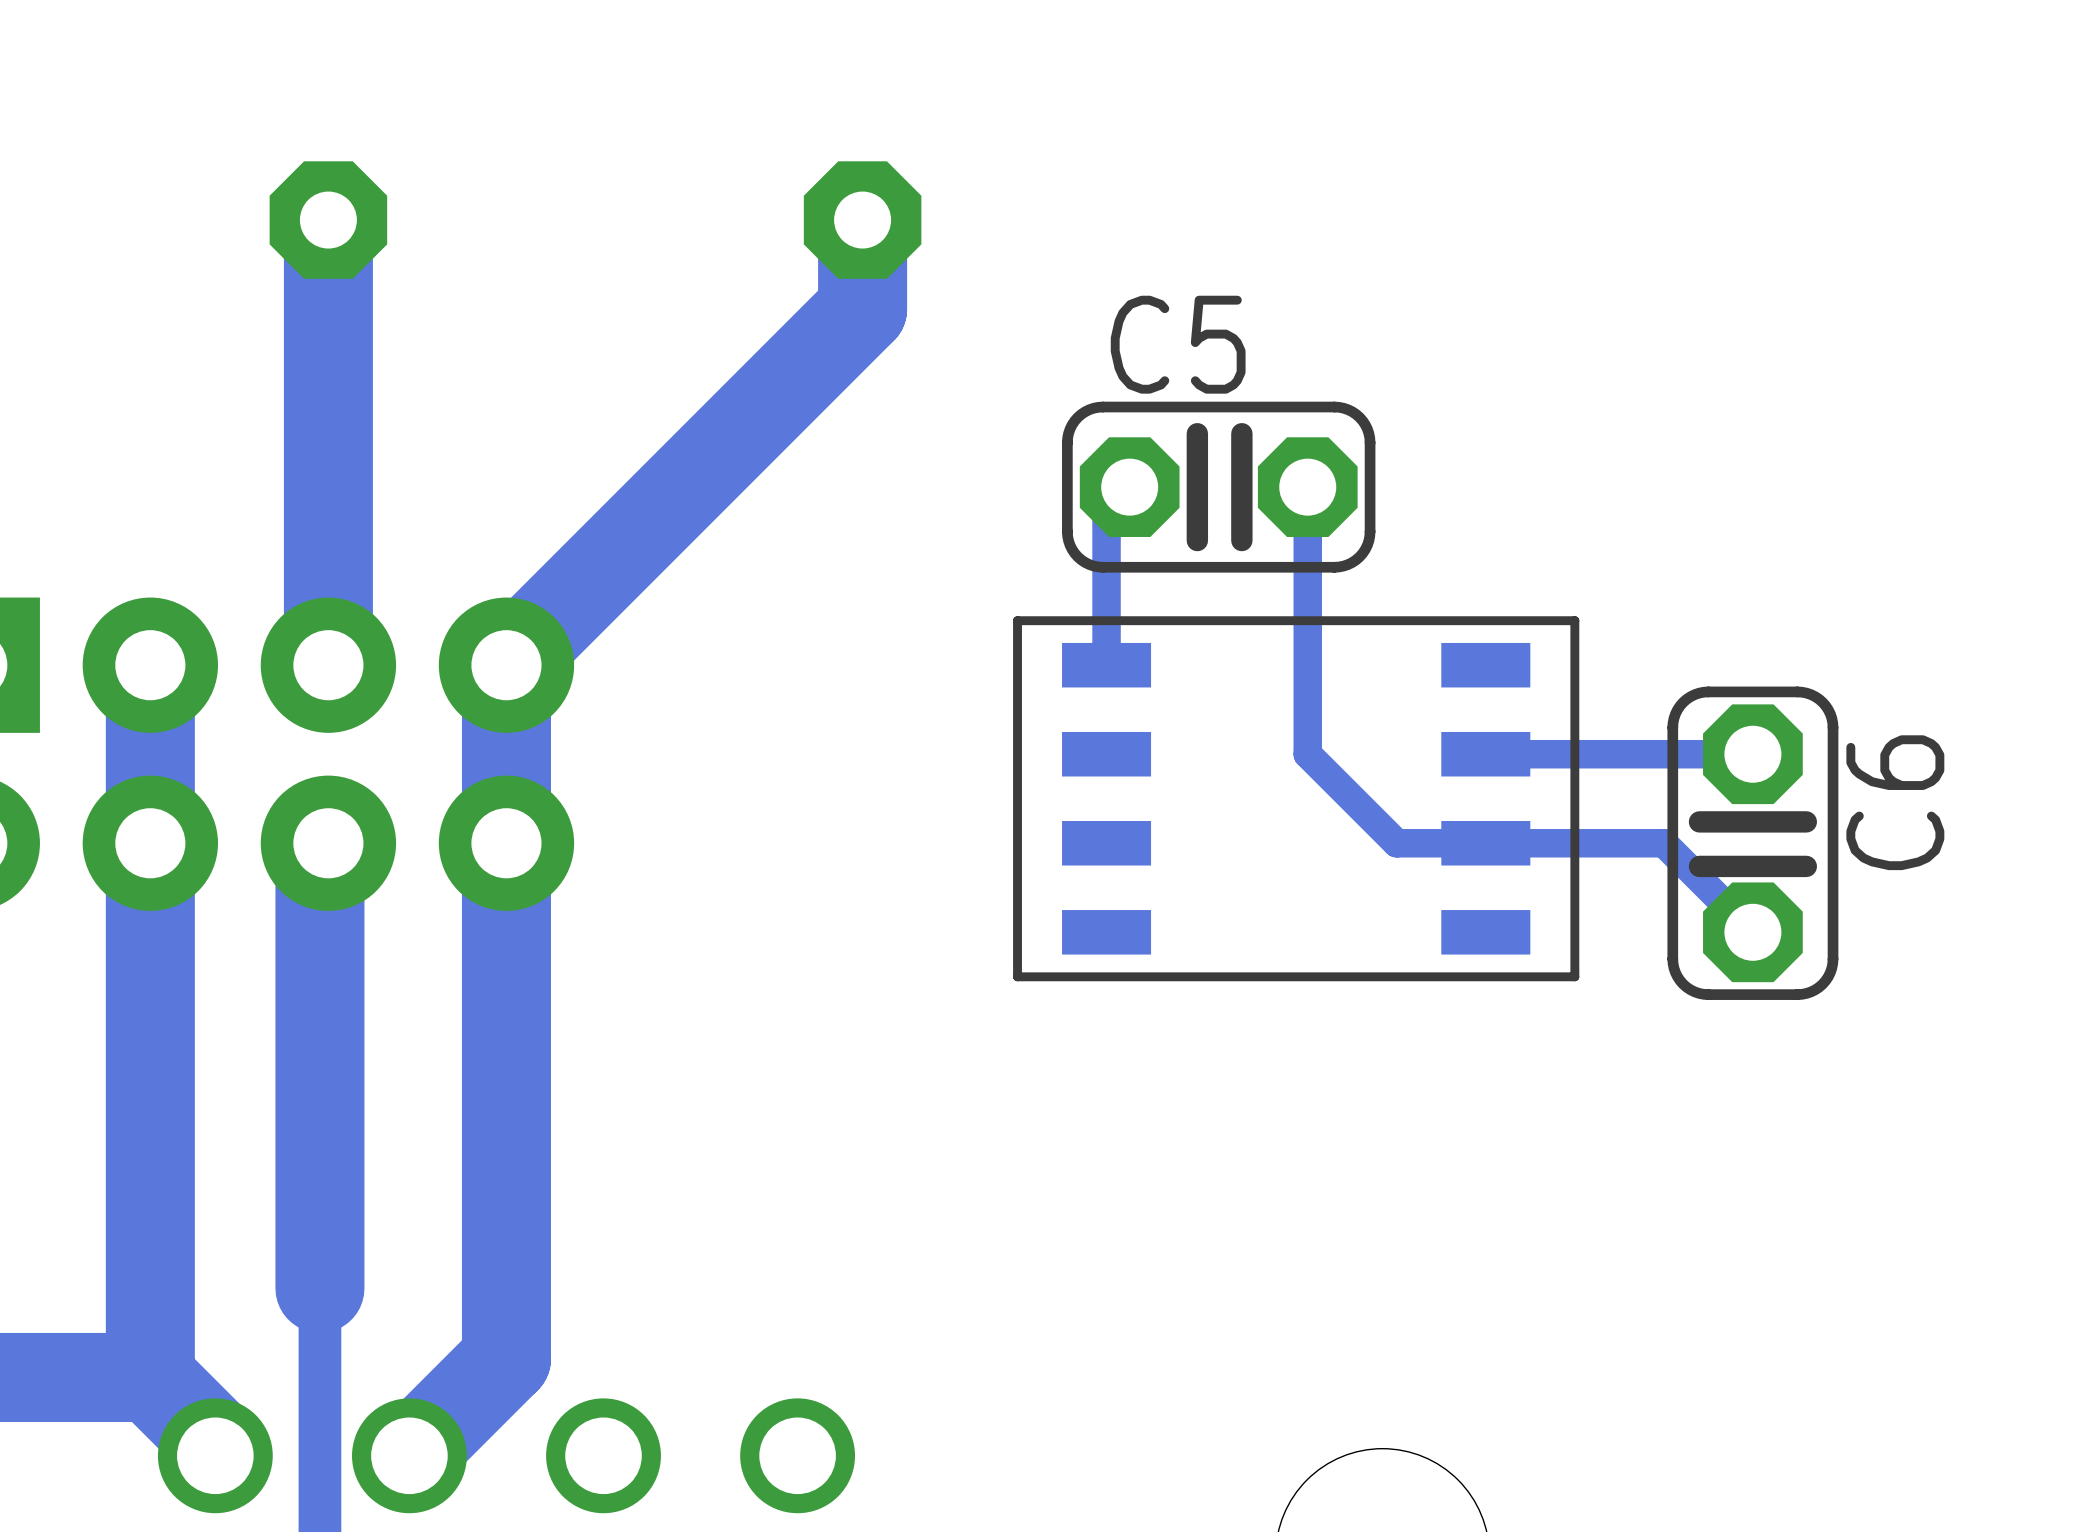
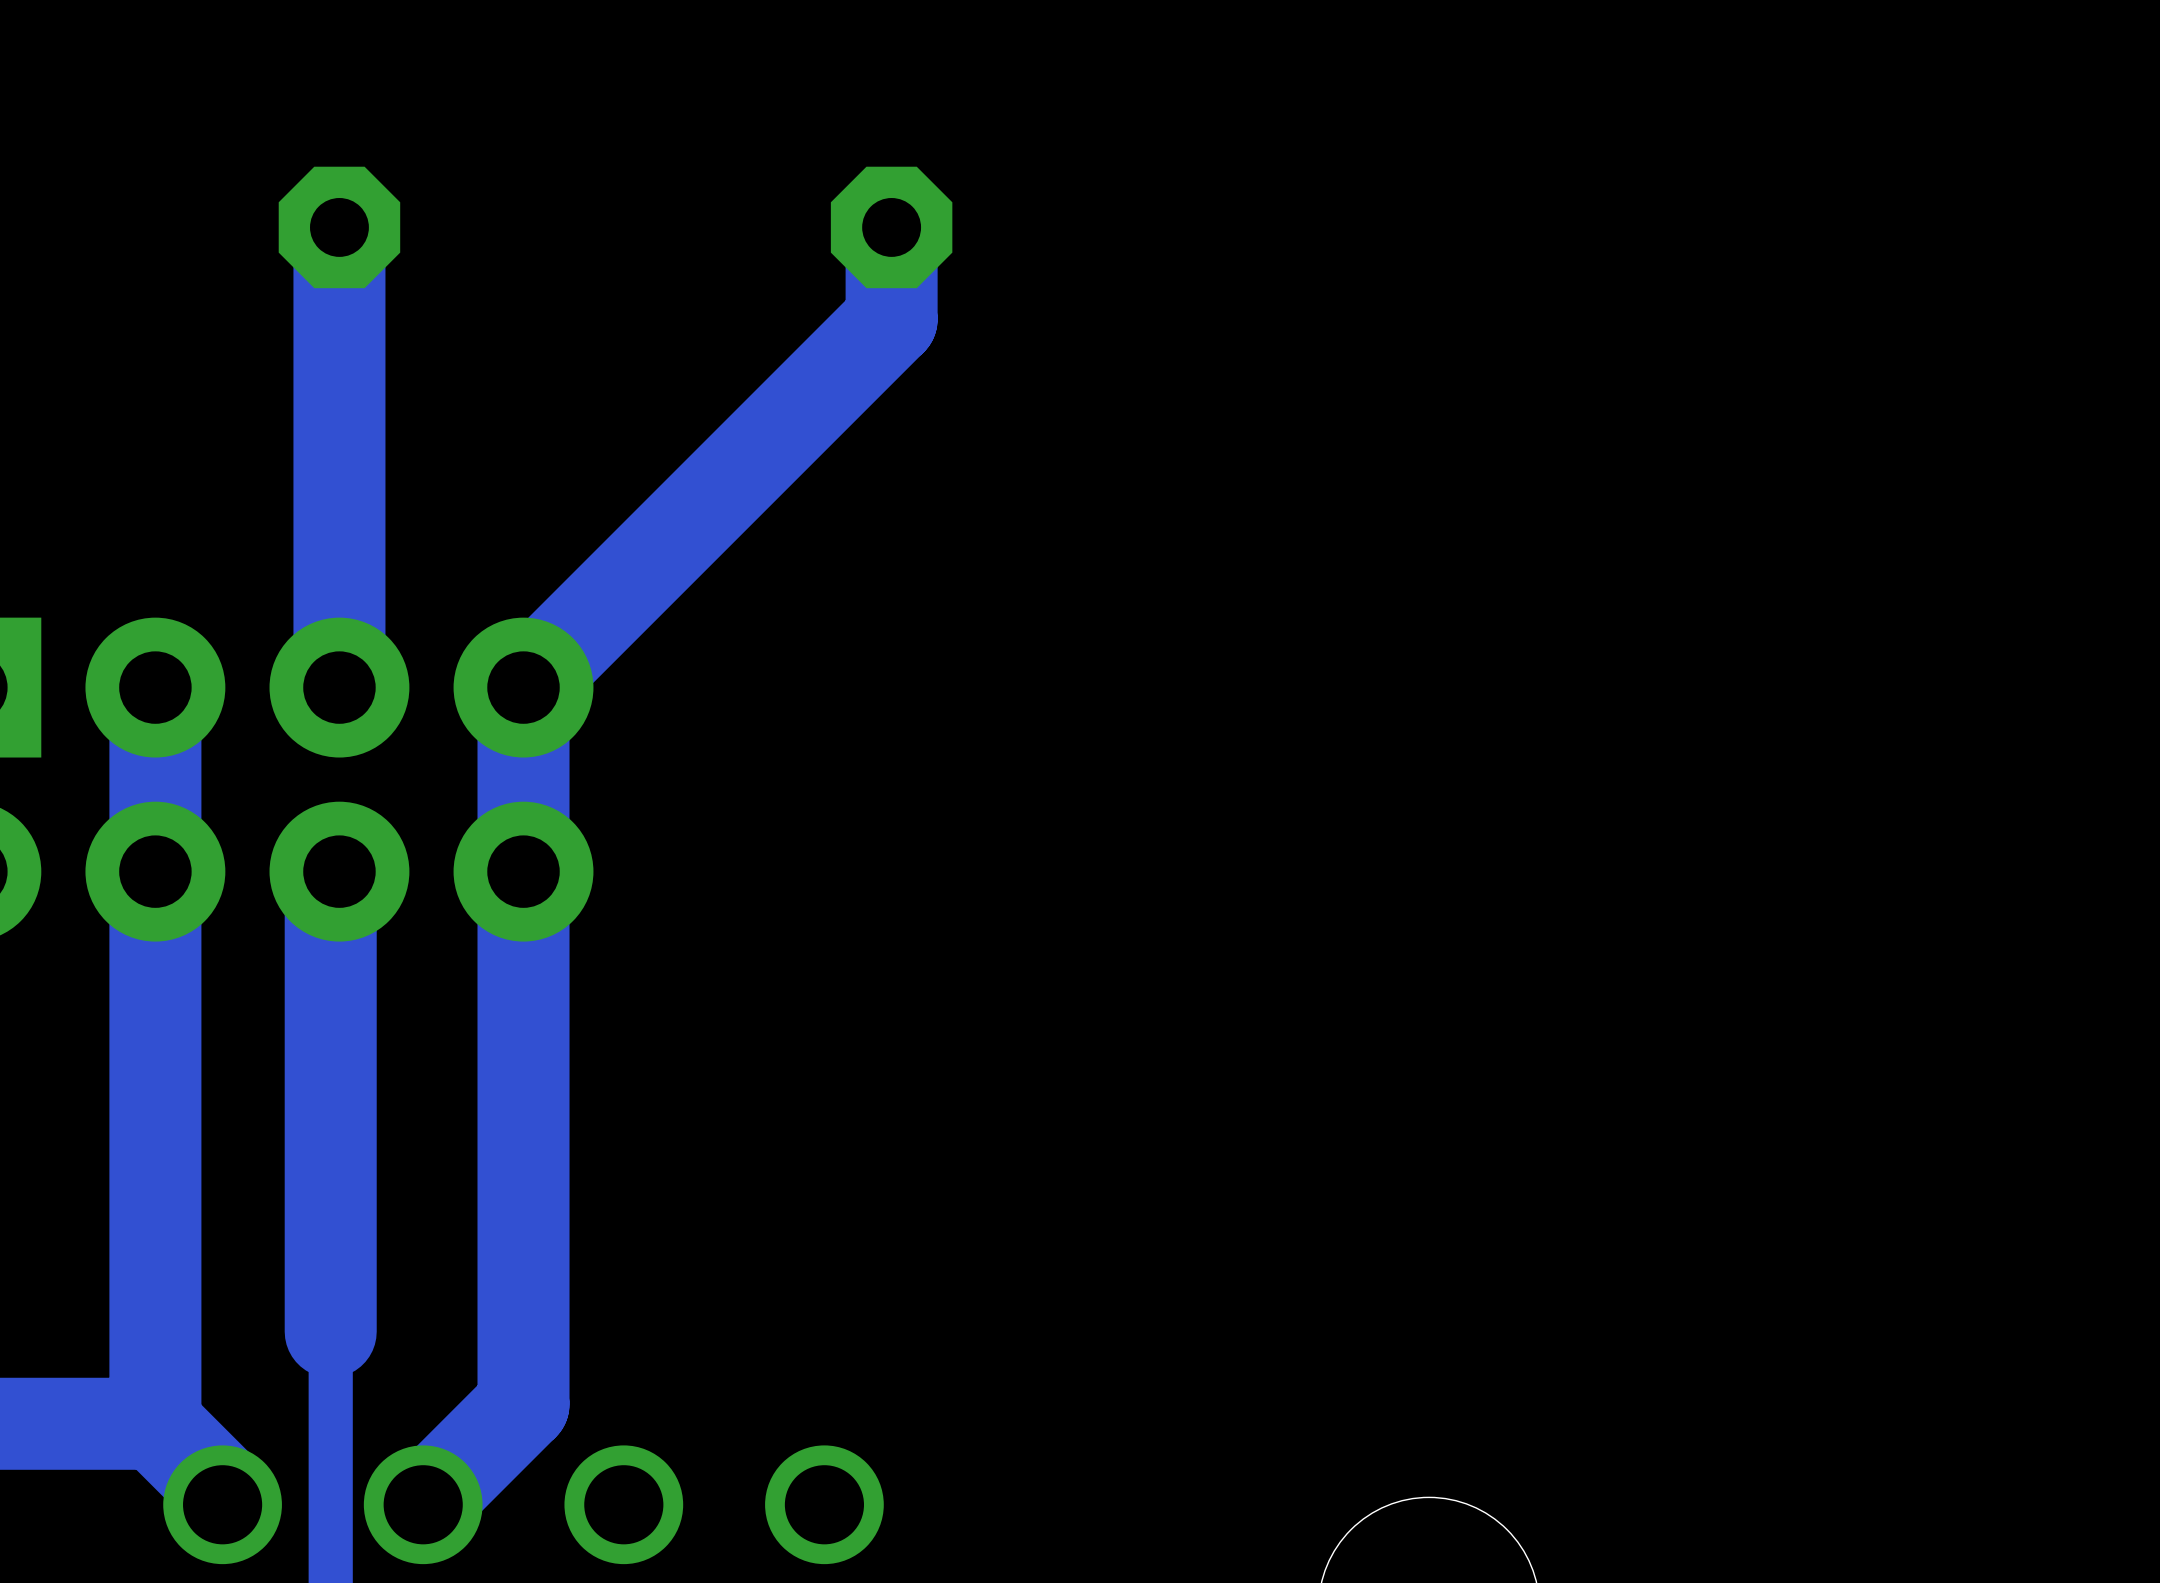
bottom track: (1129, 487) (1106, 510) (1106, 665) -> none
C5: (1218, 487) -> none
bottom track: (1307, 487) (1307, 754) (1396, 843) (1663, 843) (1752, 932) -> none
bottom track: (1752, 754) (1485, 754) -> none
part: (1296, 798) -> none
C6: (1752, 843) -> none

